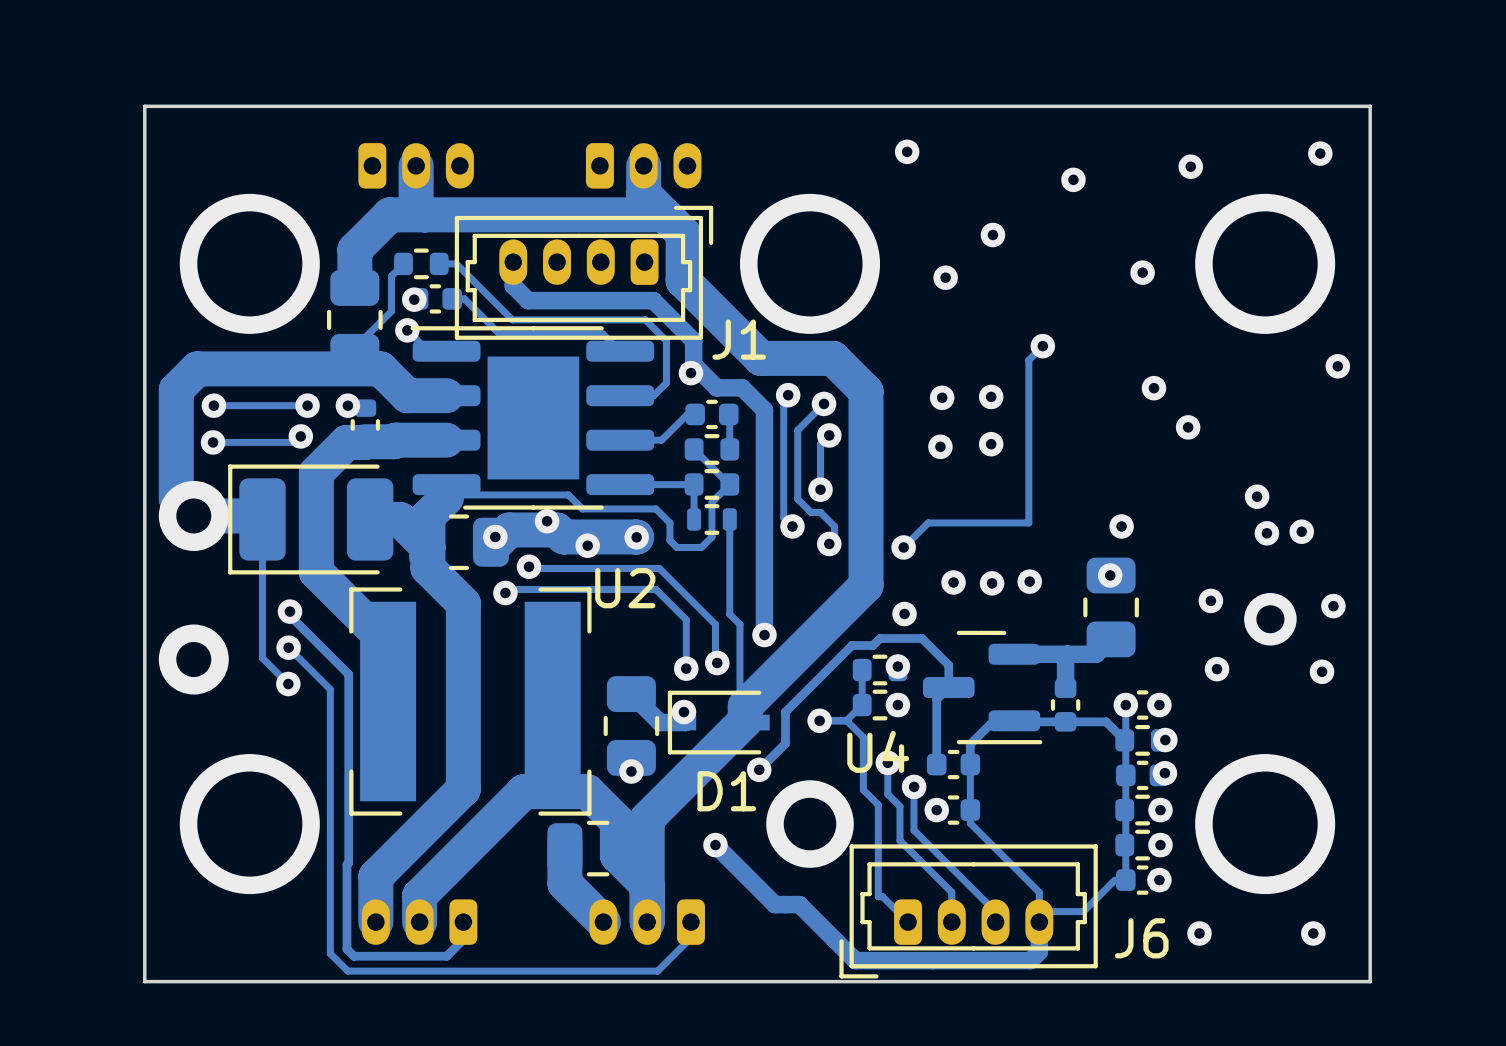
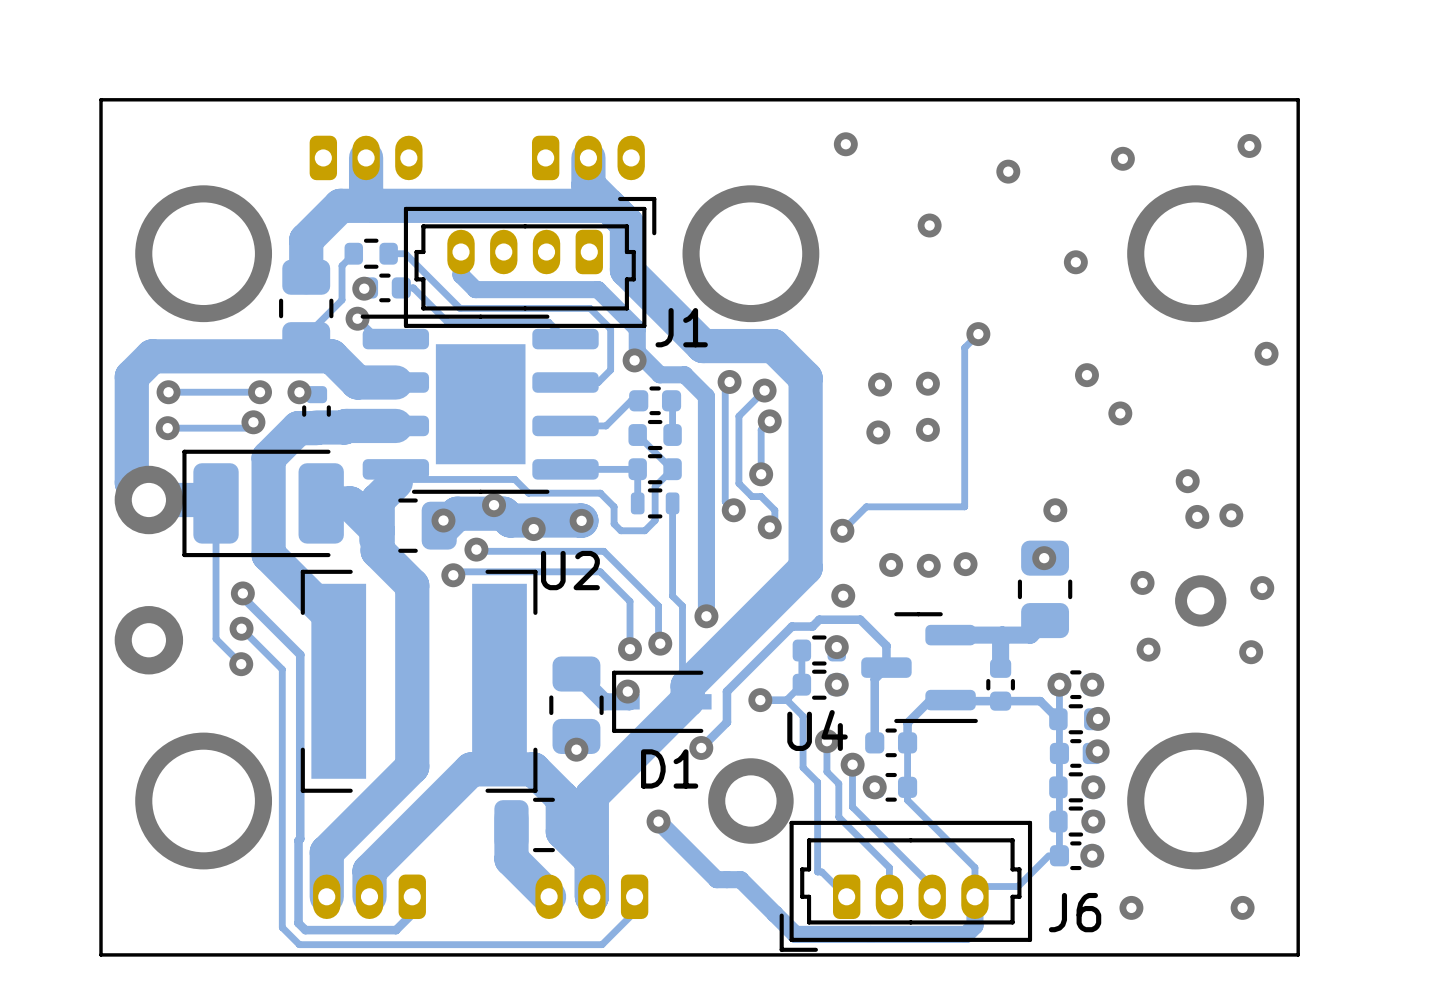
via: (945, 277) -> none

